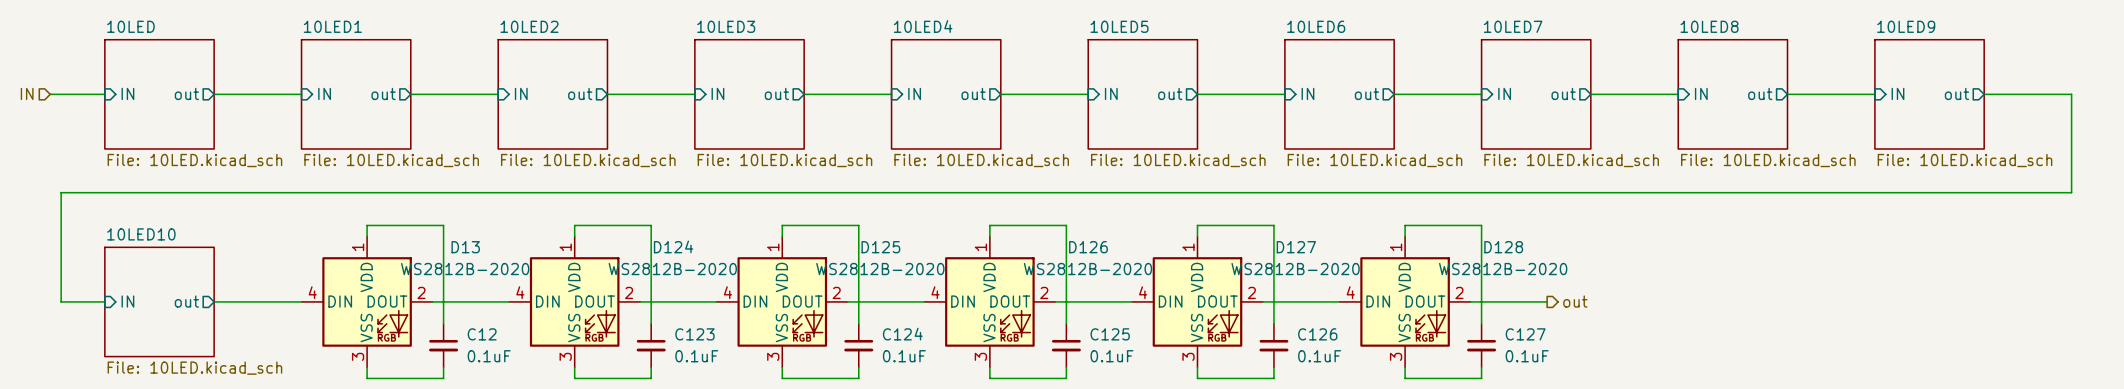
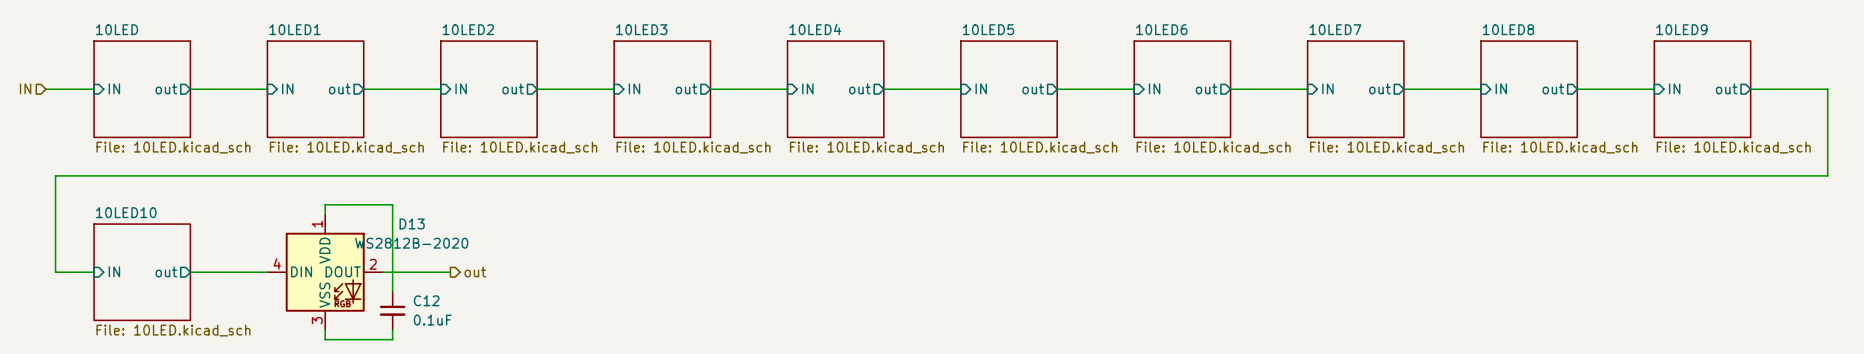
wire: (574, 236) (574, 225) (651, 225) (651, 323) -> none
wire: (782, 236) (782, 225) (858, 225) (858, 323) -> none
wire: (989, 236) (989, 225) (1066, 225) (1066, 323) -> none
wire: (1197, 236) (1197, 225) (1273, 225) (1273, 323) -> none
wire: (1405, 236) (1405, 225) (1481, 225) (1481, 323) -> none
hierarchical label: none -> out (475, 271)
D124: WS2812B-2020 (574, 301) -> none
wire: (640, 301) (716, 301) -> none
D125: WS2812B-2020 (782, 301) -> none
wire: (847, 301) (924, 301) -> none
D126: WS2812B-2020 (989, 301) -> none
wire: (1055, 301) (1131, 301) -> none
D127: WS2812B-2020 (1197, 301) -> none
wire: (1263, 301) (1339, 301) -> none
D128: WS2812B-2020 (1405, 301) -> none
wire: (1470, 301) (1547, 301) -> none
hierarchical label: out (1575, 301) -> none
C123: 0.1uF (651, 345) -> none
C124: 0.1uF (858, 345) -> none
C125: 0.1uF (1066, 345) -> none
C126: 0.1uF (1273, 345) -> none
C127: 0.1uF (1481, 345) -> none
wire: (574, 367) (574, 378) (651, 378) (651, 367) -> none
wire: (782, 367) (782, 378) (858, 378) (858, 367) -> none
wire: (989, 367) (989, 378) (1066, 378) (1066, 367) -> none
wire: (1197, 367) (1197, 378) (1273, 378) (1273, 367) -> none
wire: (1405, 367) (1405, 378) (1481, 378) (1481, 367) -> none

